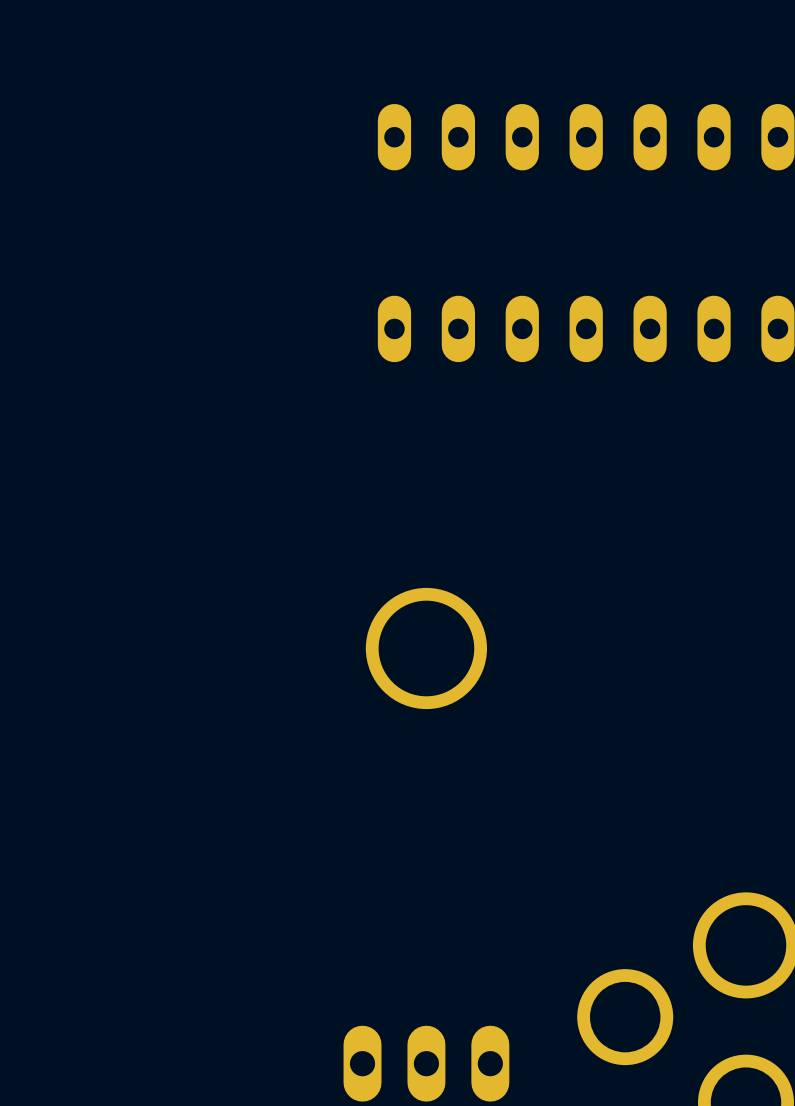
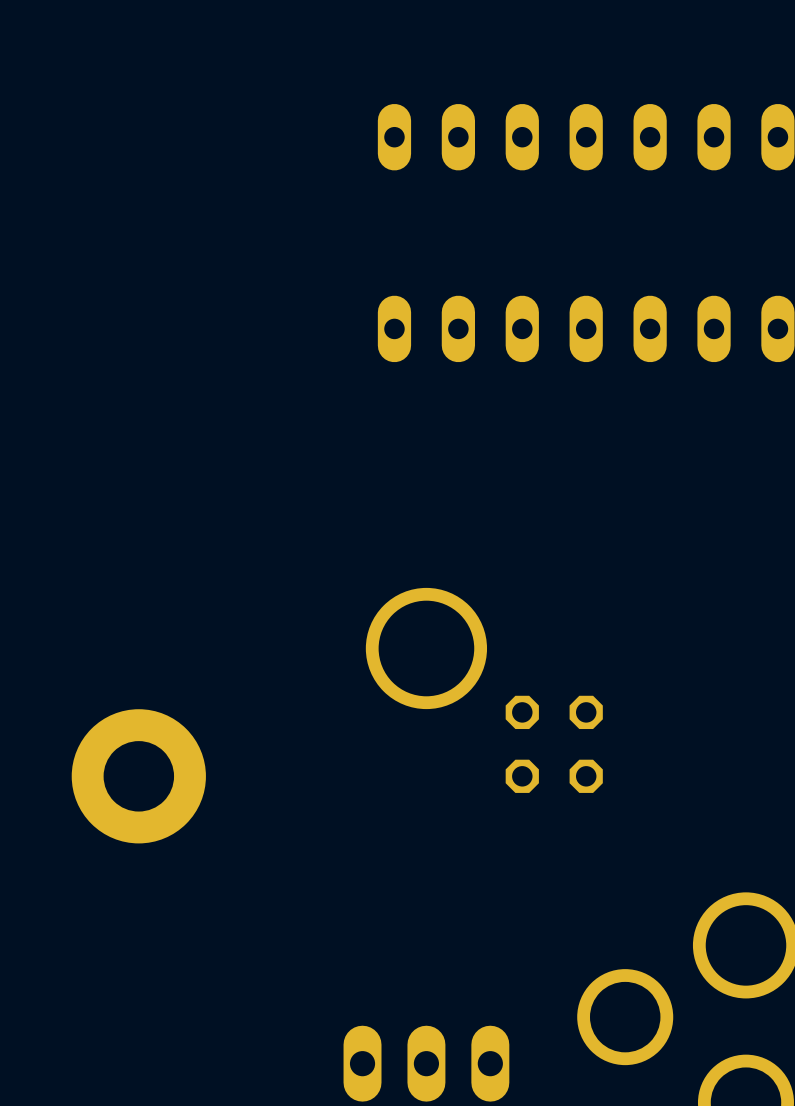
part: none -> (554, 712)
part: none -> (138, 776)
part: none -> (554, 776)

